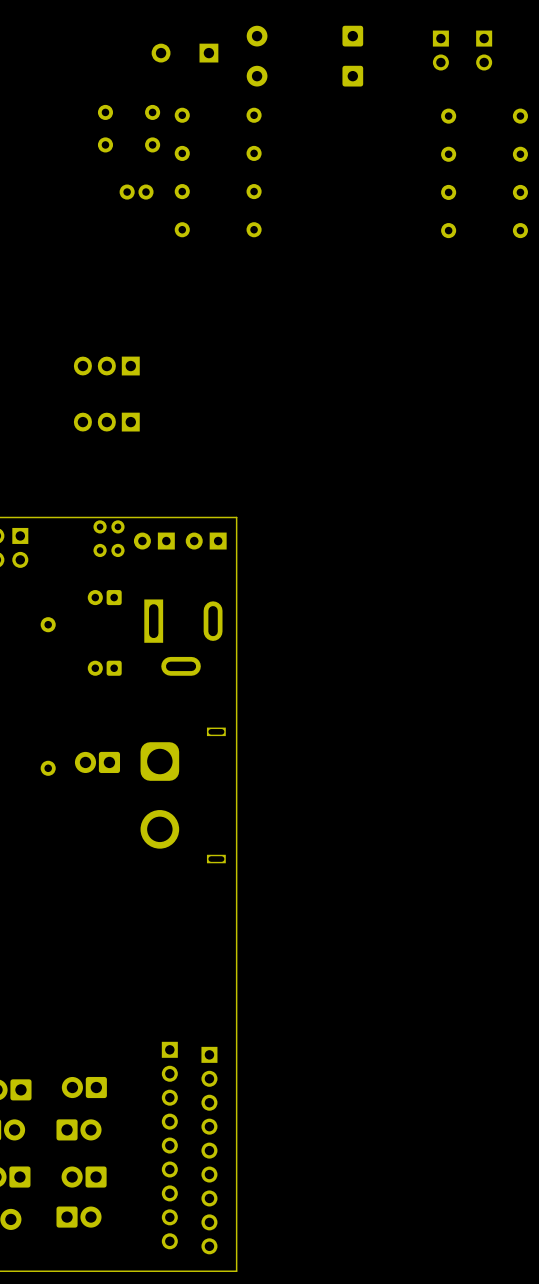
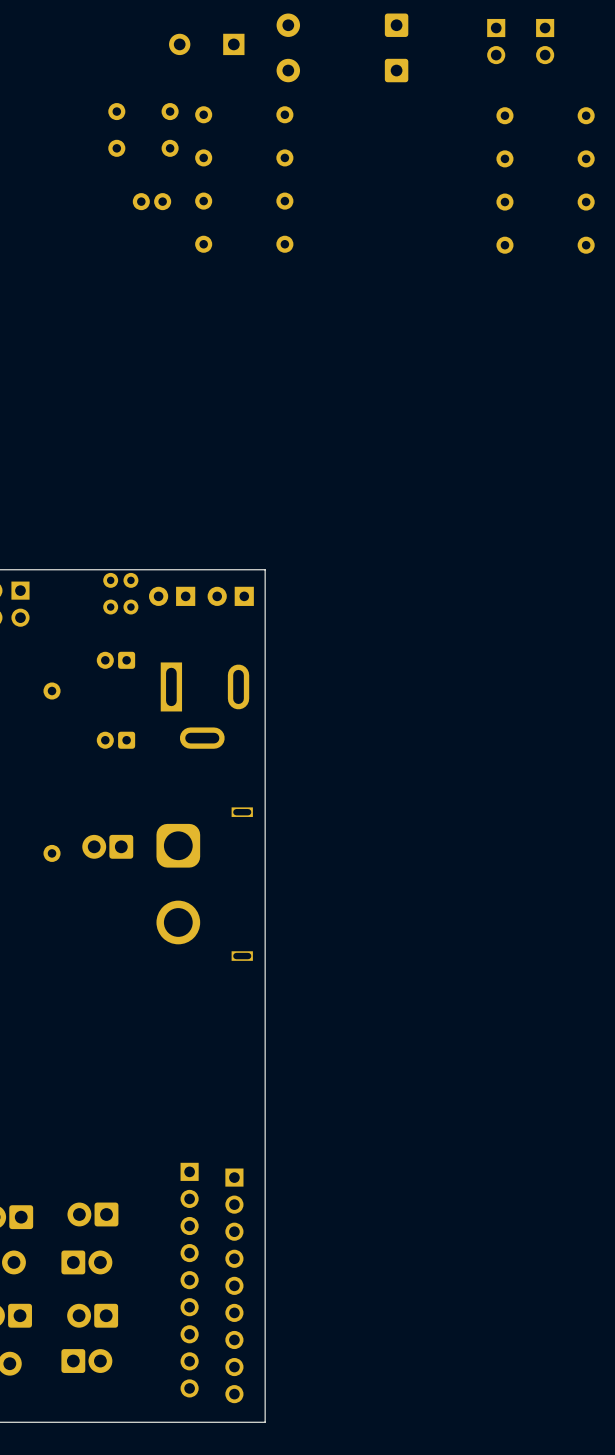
part: (106, 366) -> none
part: (106, 422) -> none

